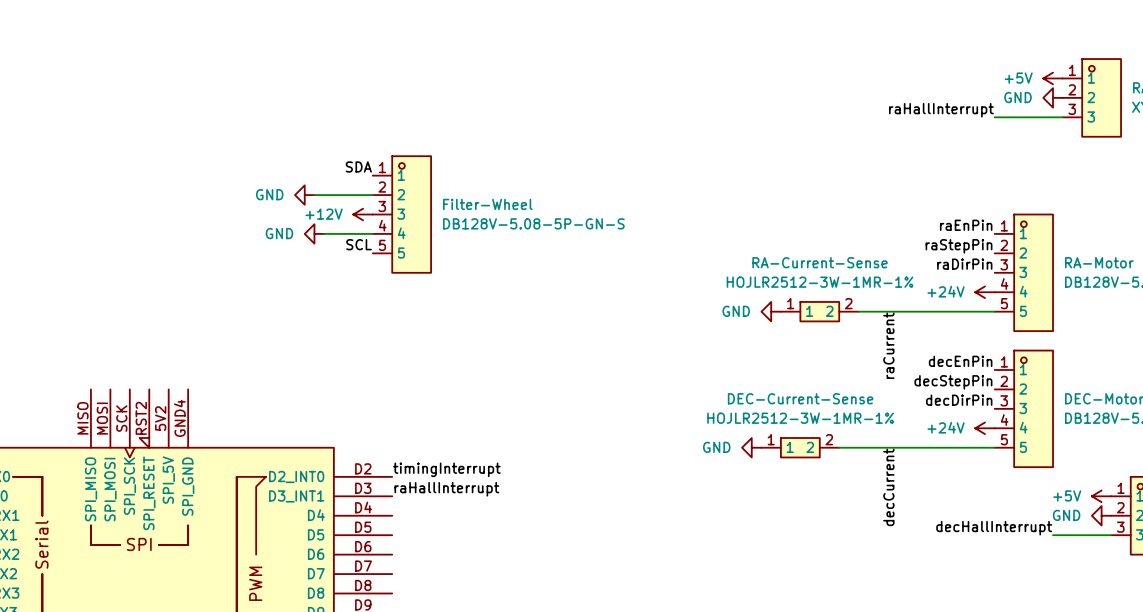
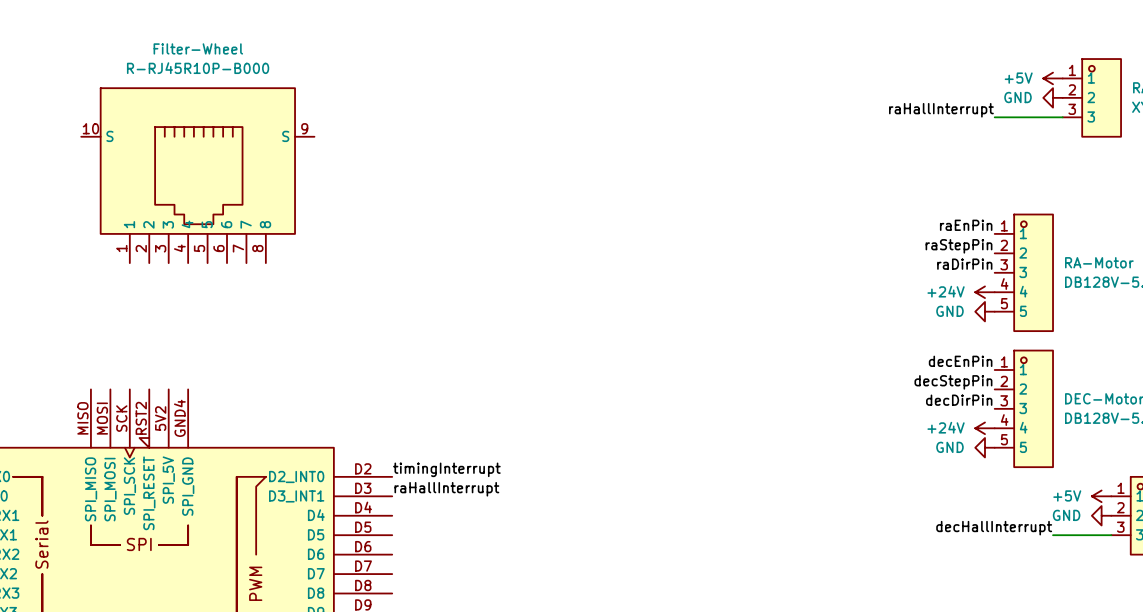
label: SDA (358, 166) -> none
Filter-Wheel: none -> R-RJ45R10P-B000 (197, 175)
power symbol: GND (304, 195) -> none
wire: (314, 195) (372, 195) -> none
power symbol: +12V (363, 214) -> none
Filter-Wheel: DB128V-5.08-5P-GN-S (401, 214) -> none
power symbol: GND (314, 233) -> none
wire: (324, 233) (372, 233) -> none
label: SCL (359, 244) -> none
power symbol: GND (771, 311) -> none
RA-Current-Sense: HOJLR2512-3W-1MR-1% (819, 311) -> none
wire: (858, 311) (994, 311) -> none
power symbol: none -> GND (984, 311)
label: raCurrent (888, 345) -> none
power symbol: GND (751, 447) -> none
DEC-Current-Sense: HOJLR2512-3W-1MR-1% (800, 447) -> none
wire: (839, 447) (994, 447) -> none
power symbol: none -> GND (984, 447)
label: decCurrent (888, 487) -> none

